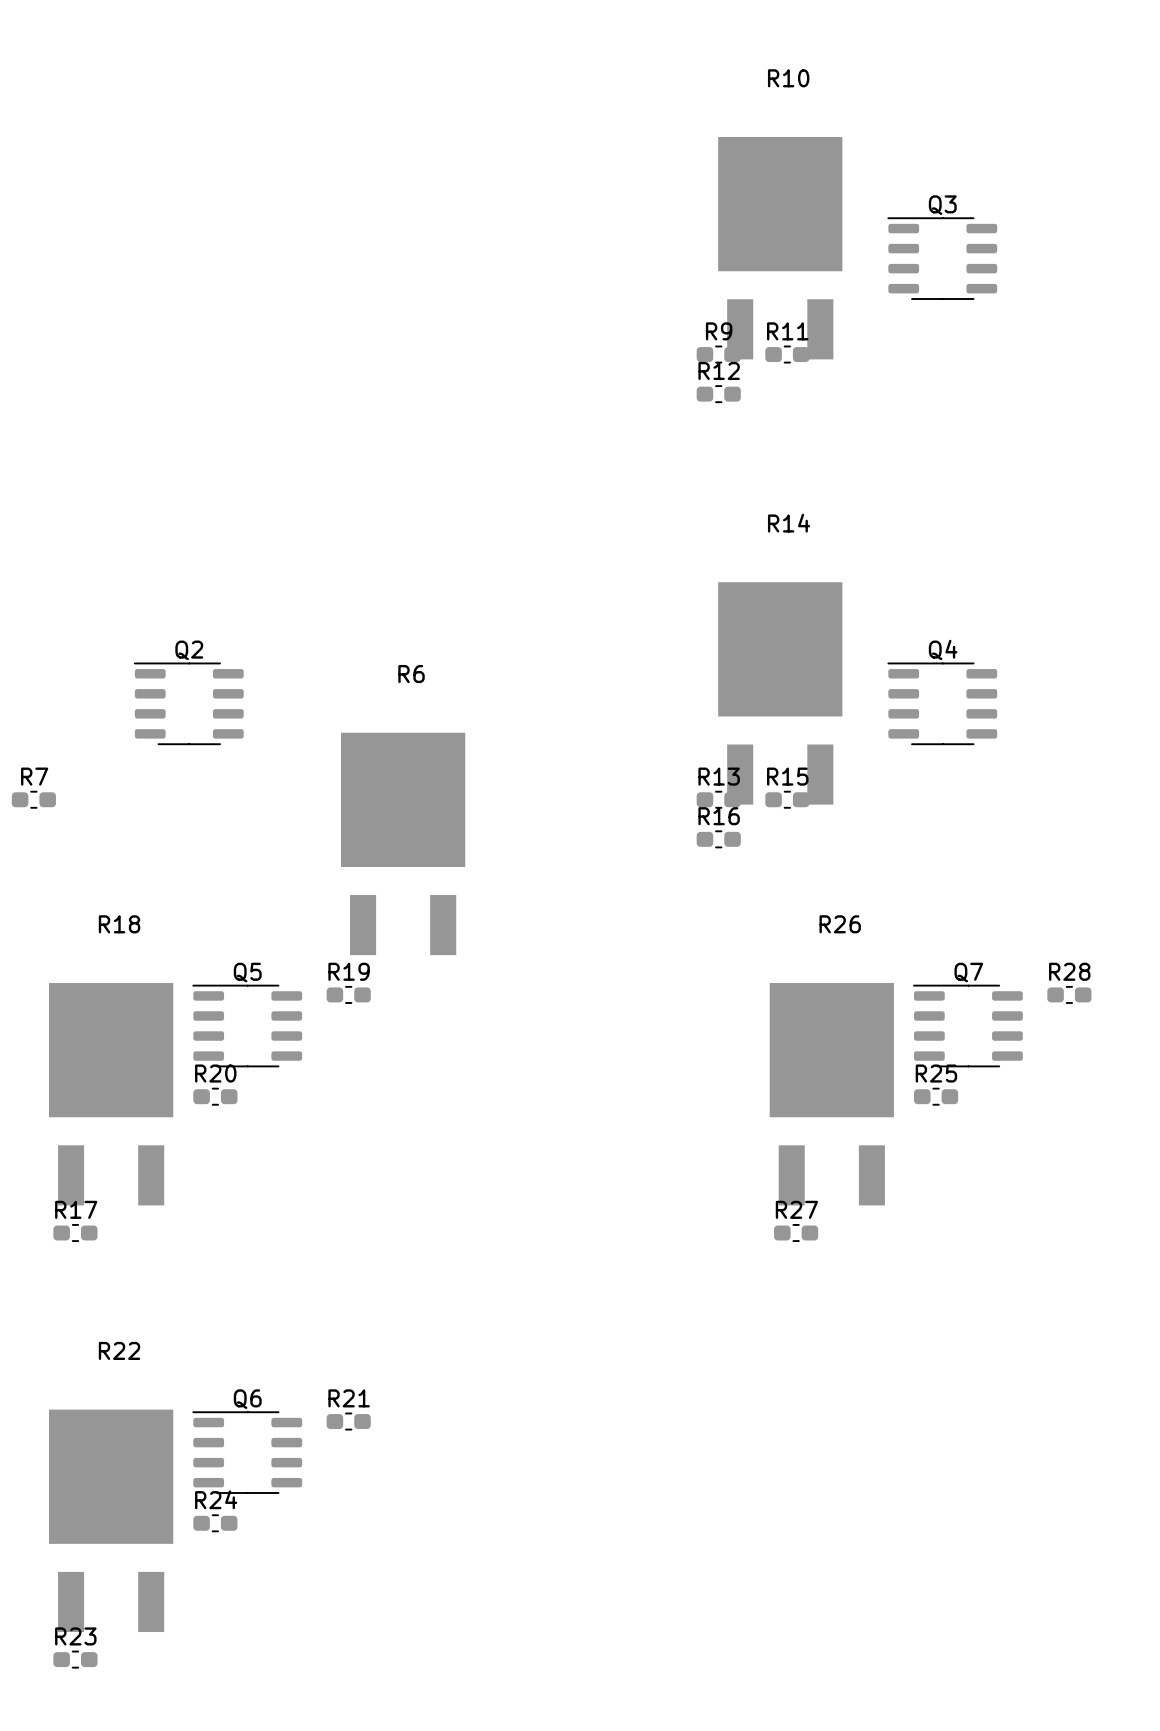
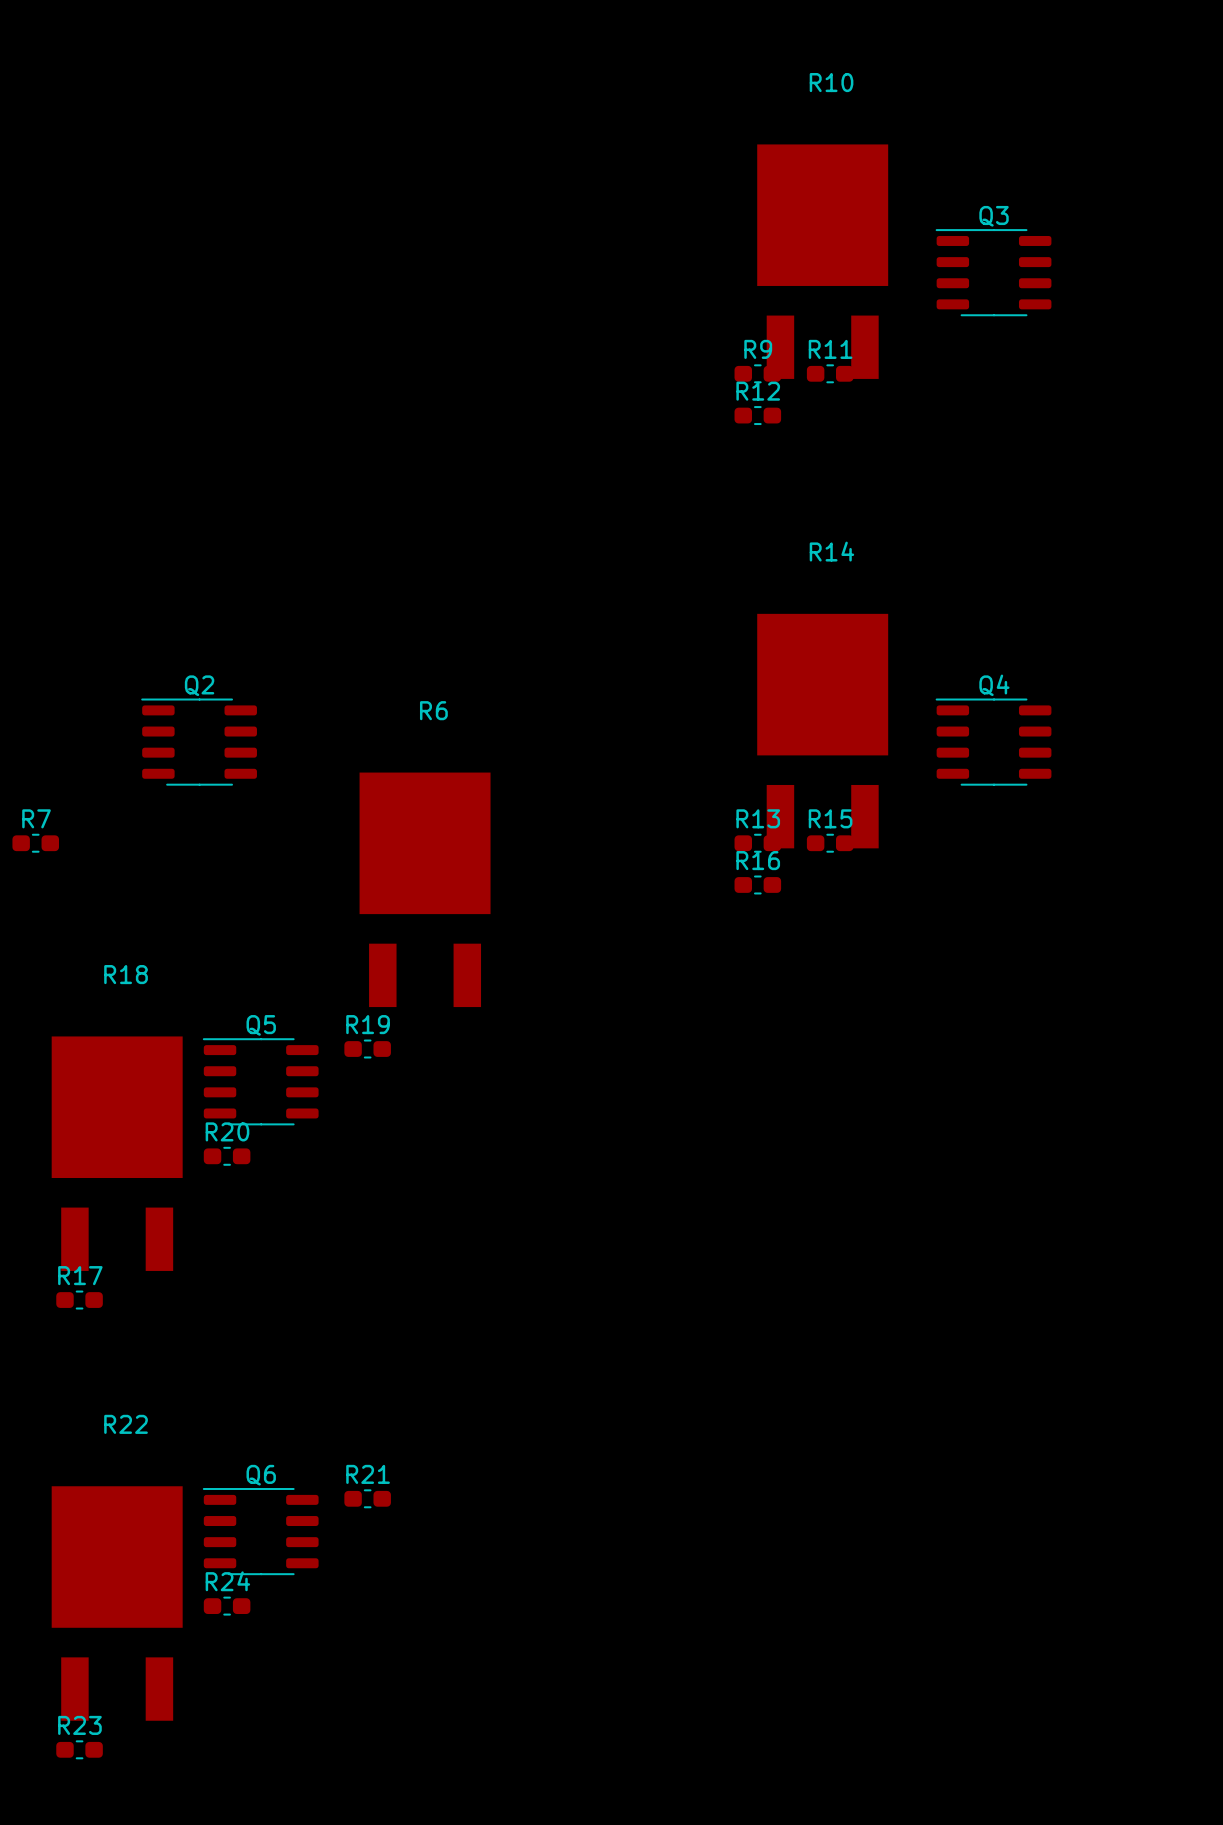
R28: (1069, 994) -> none
Q7: (967, 1026) -> none
R26: (831, 1094) -> none
R25: (936, 1096) -> none
R27: (796, 1233) -> none

